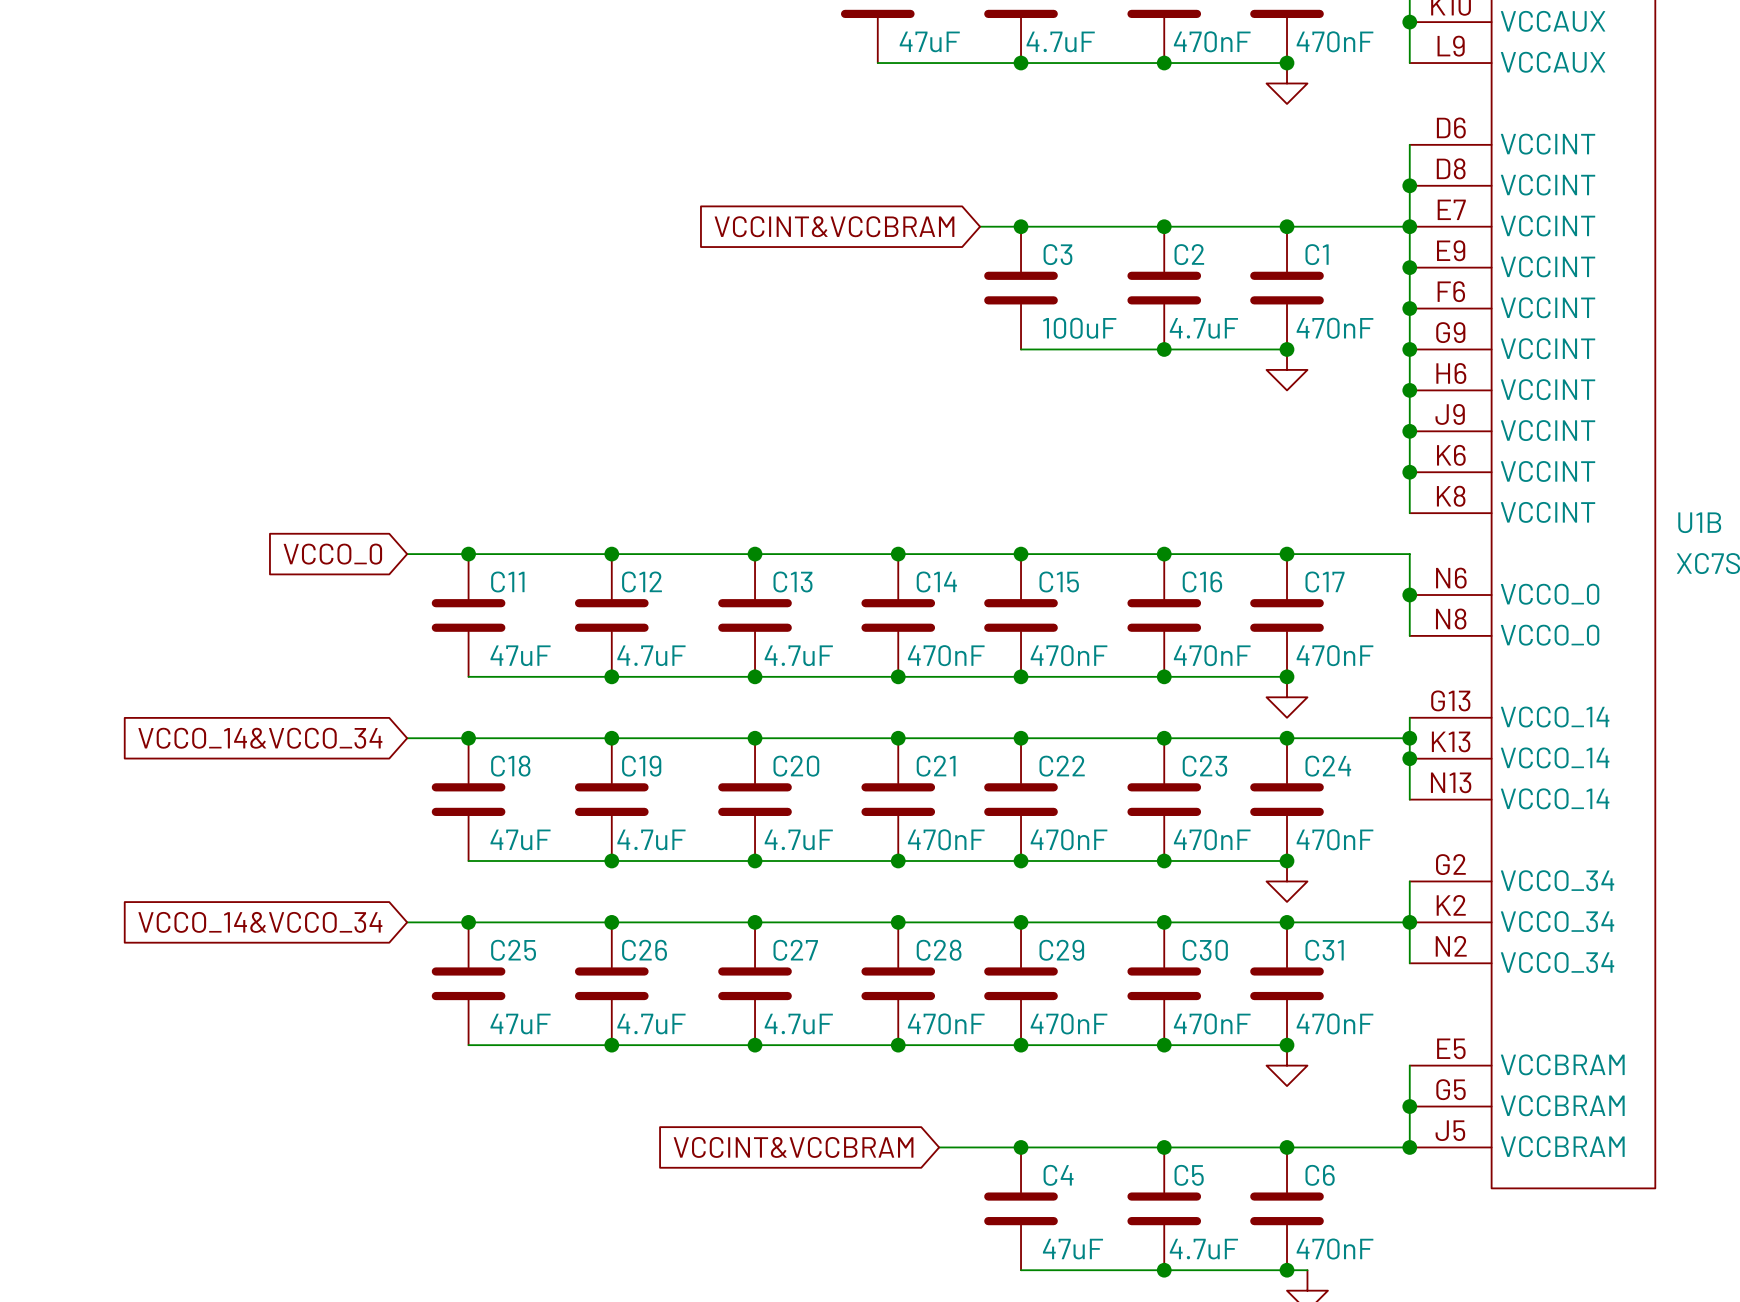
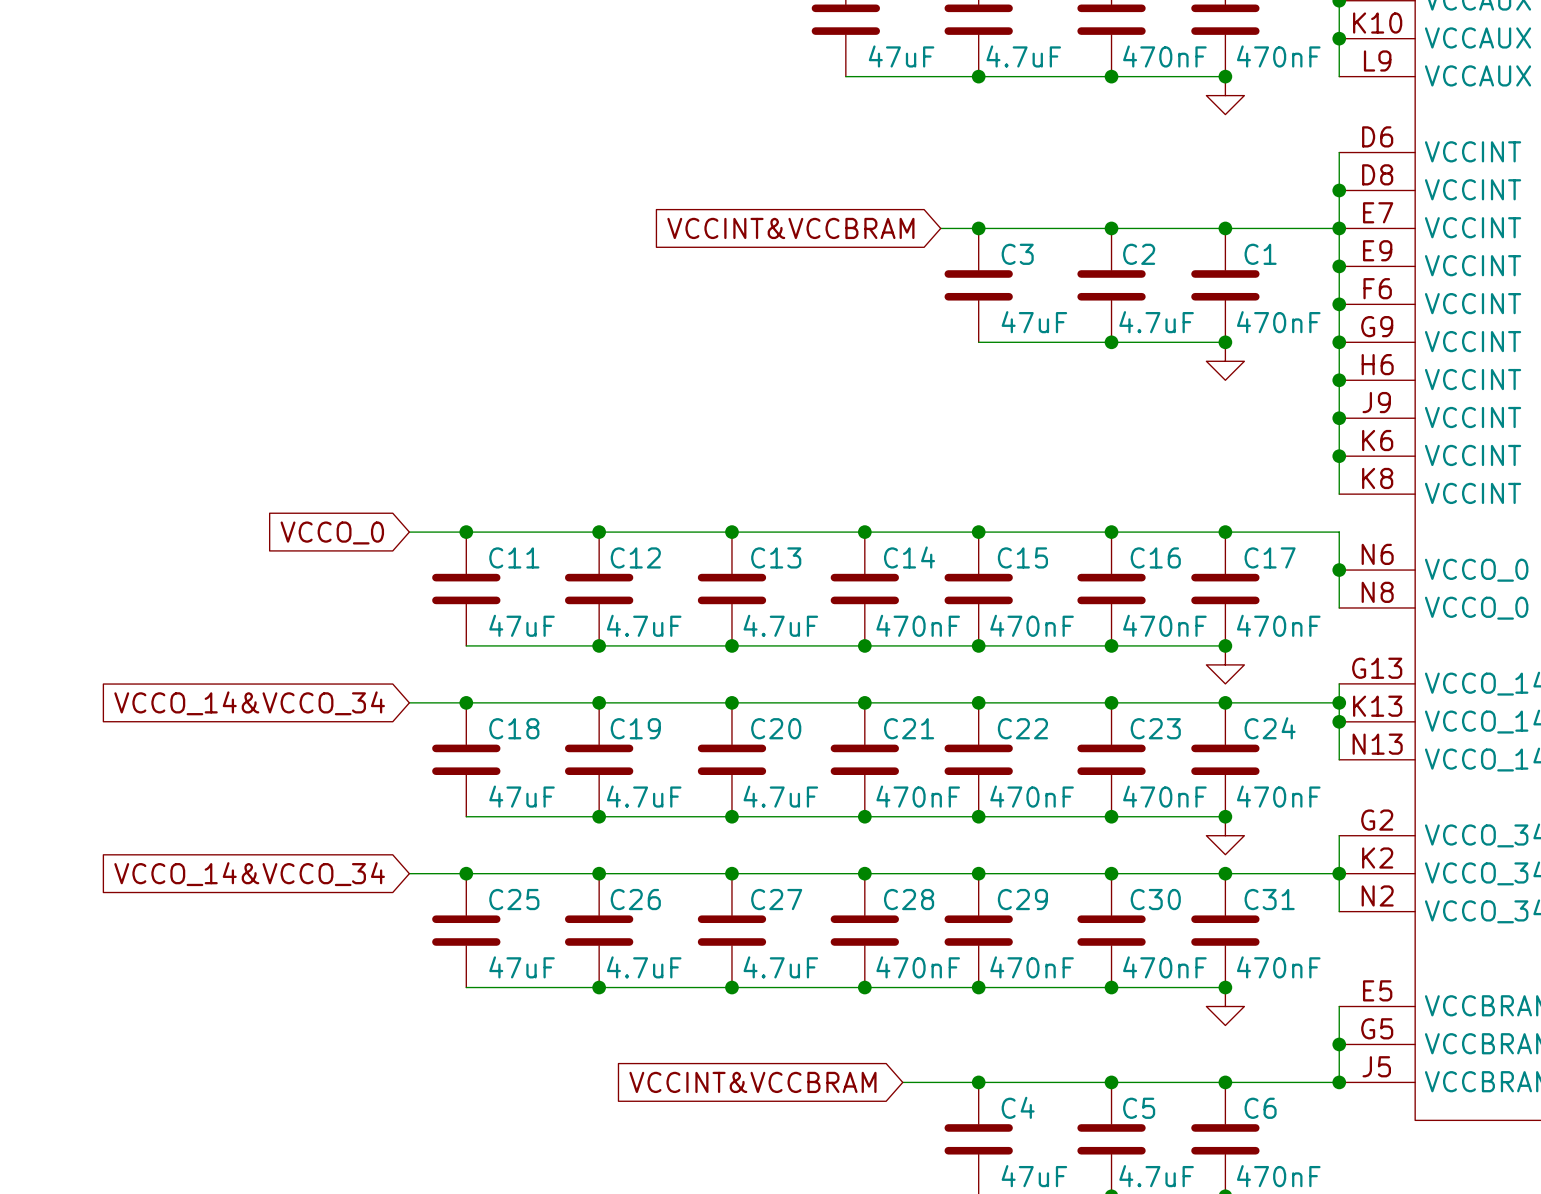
C3 value: 100uF (1079, 328) -> 47uF (1034, 322)

